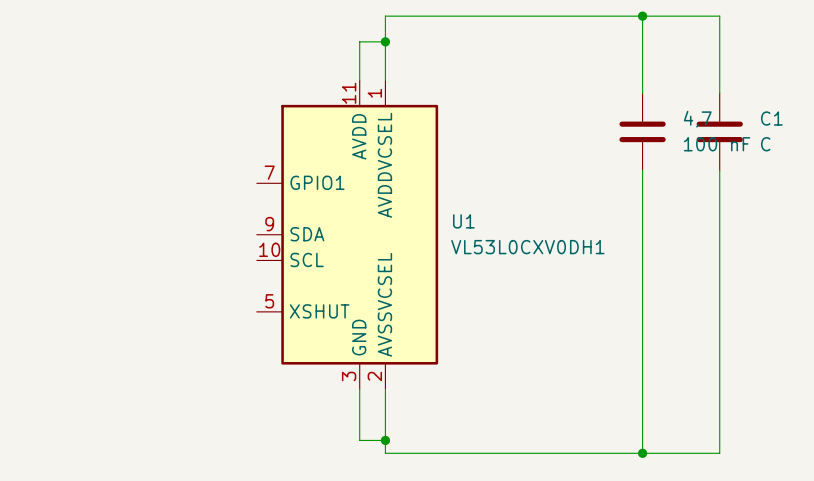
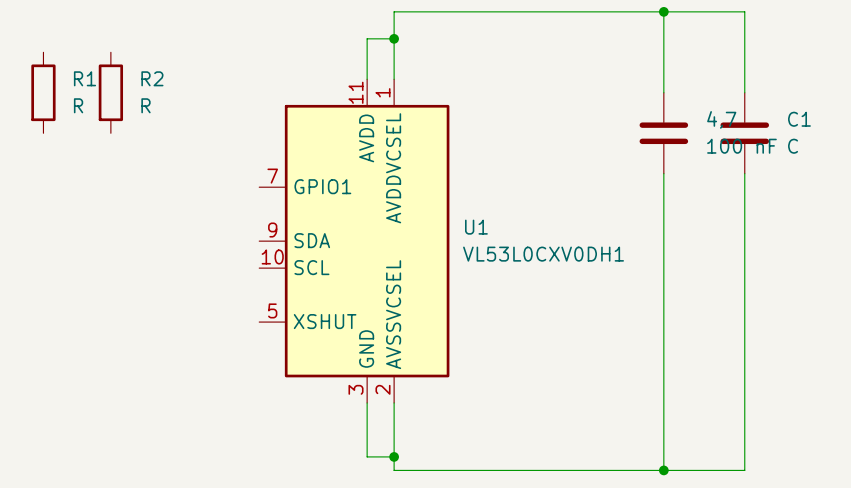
R1: none -> R (43, 92)
R2: none -> R (110, 92)

